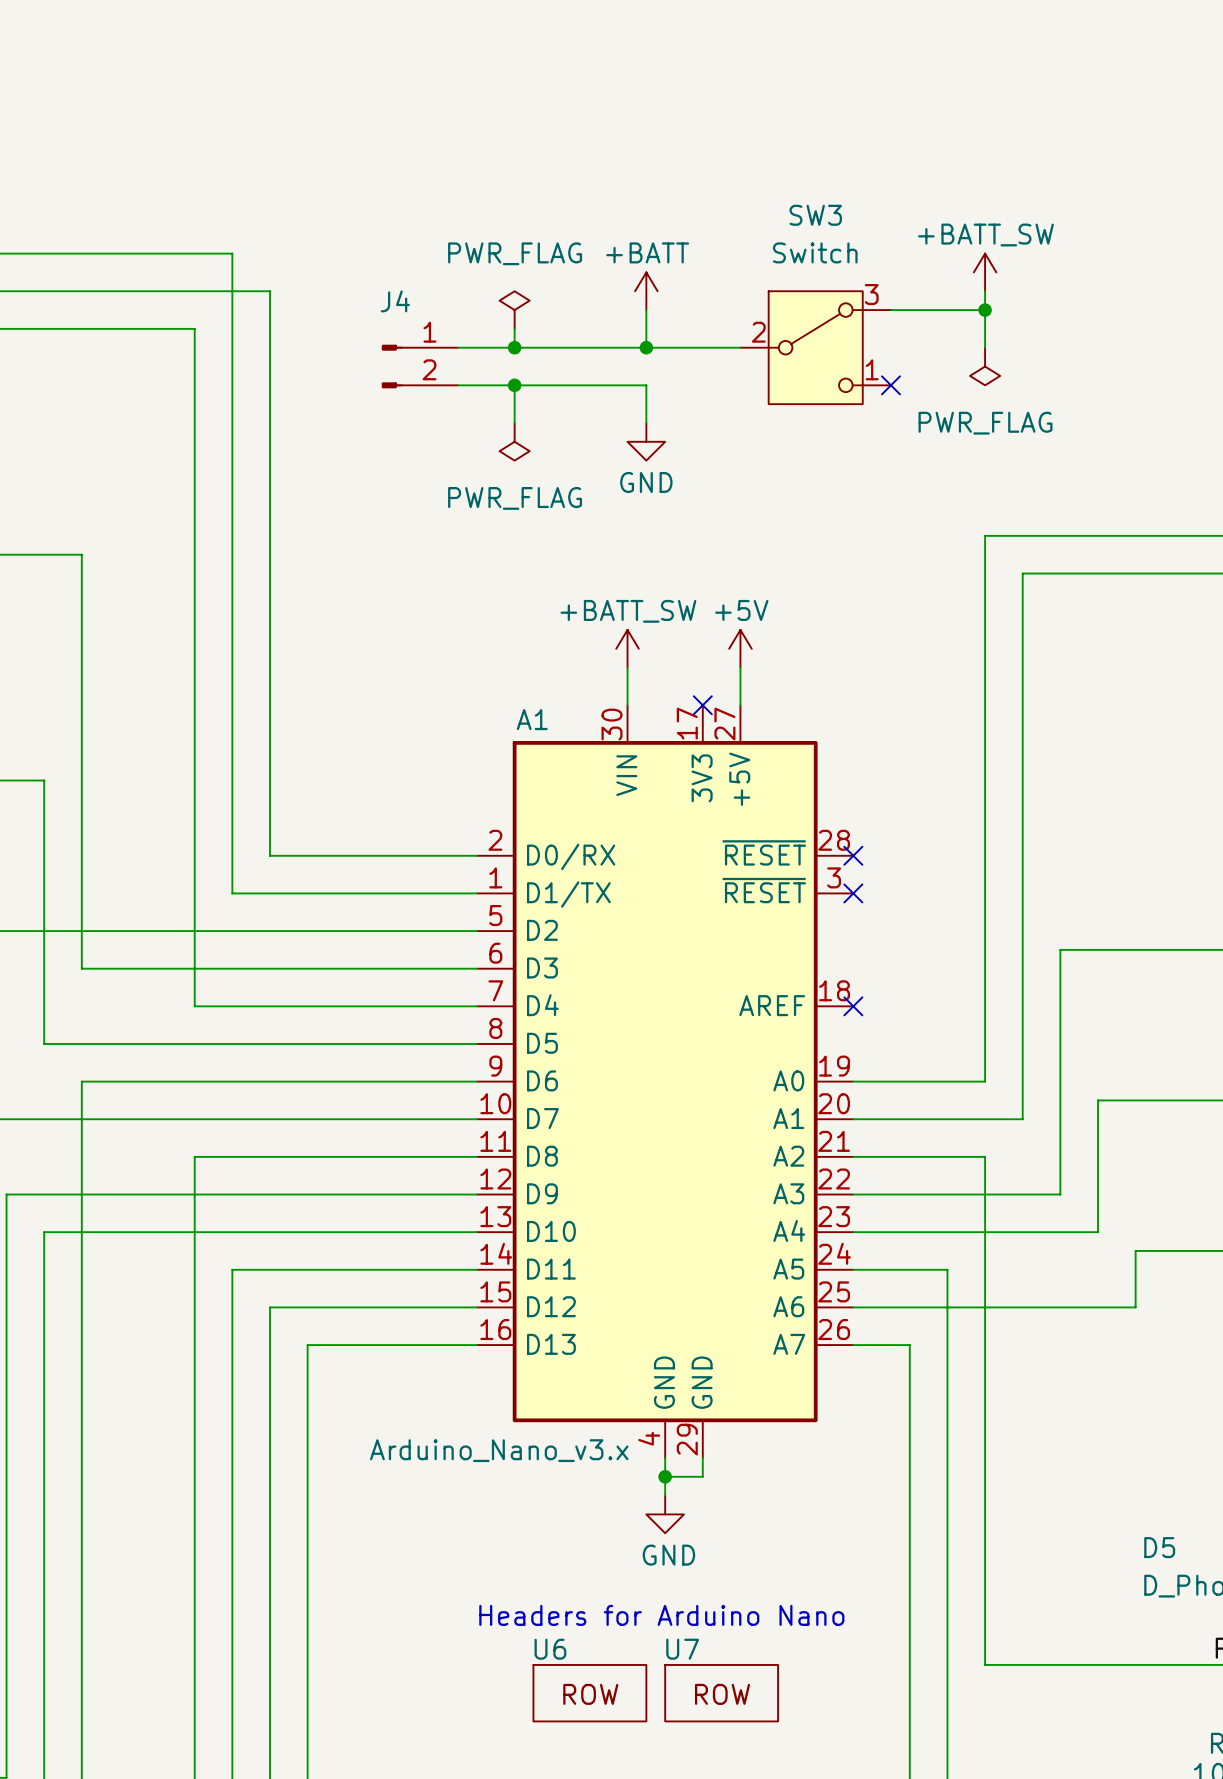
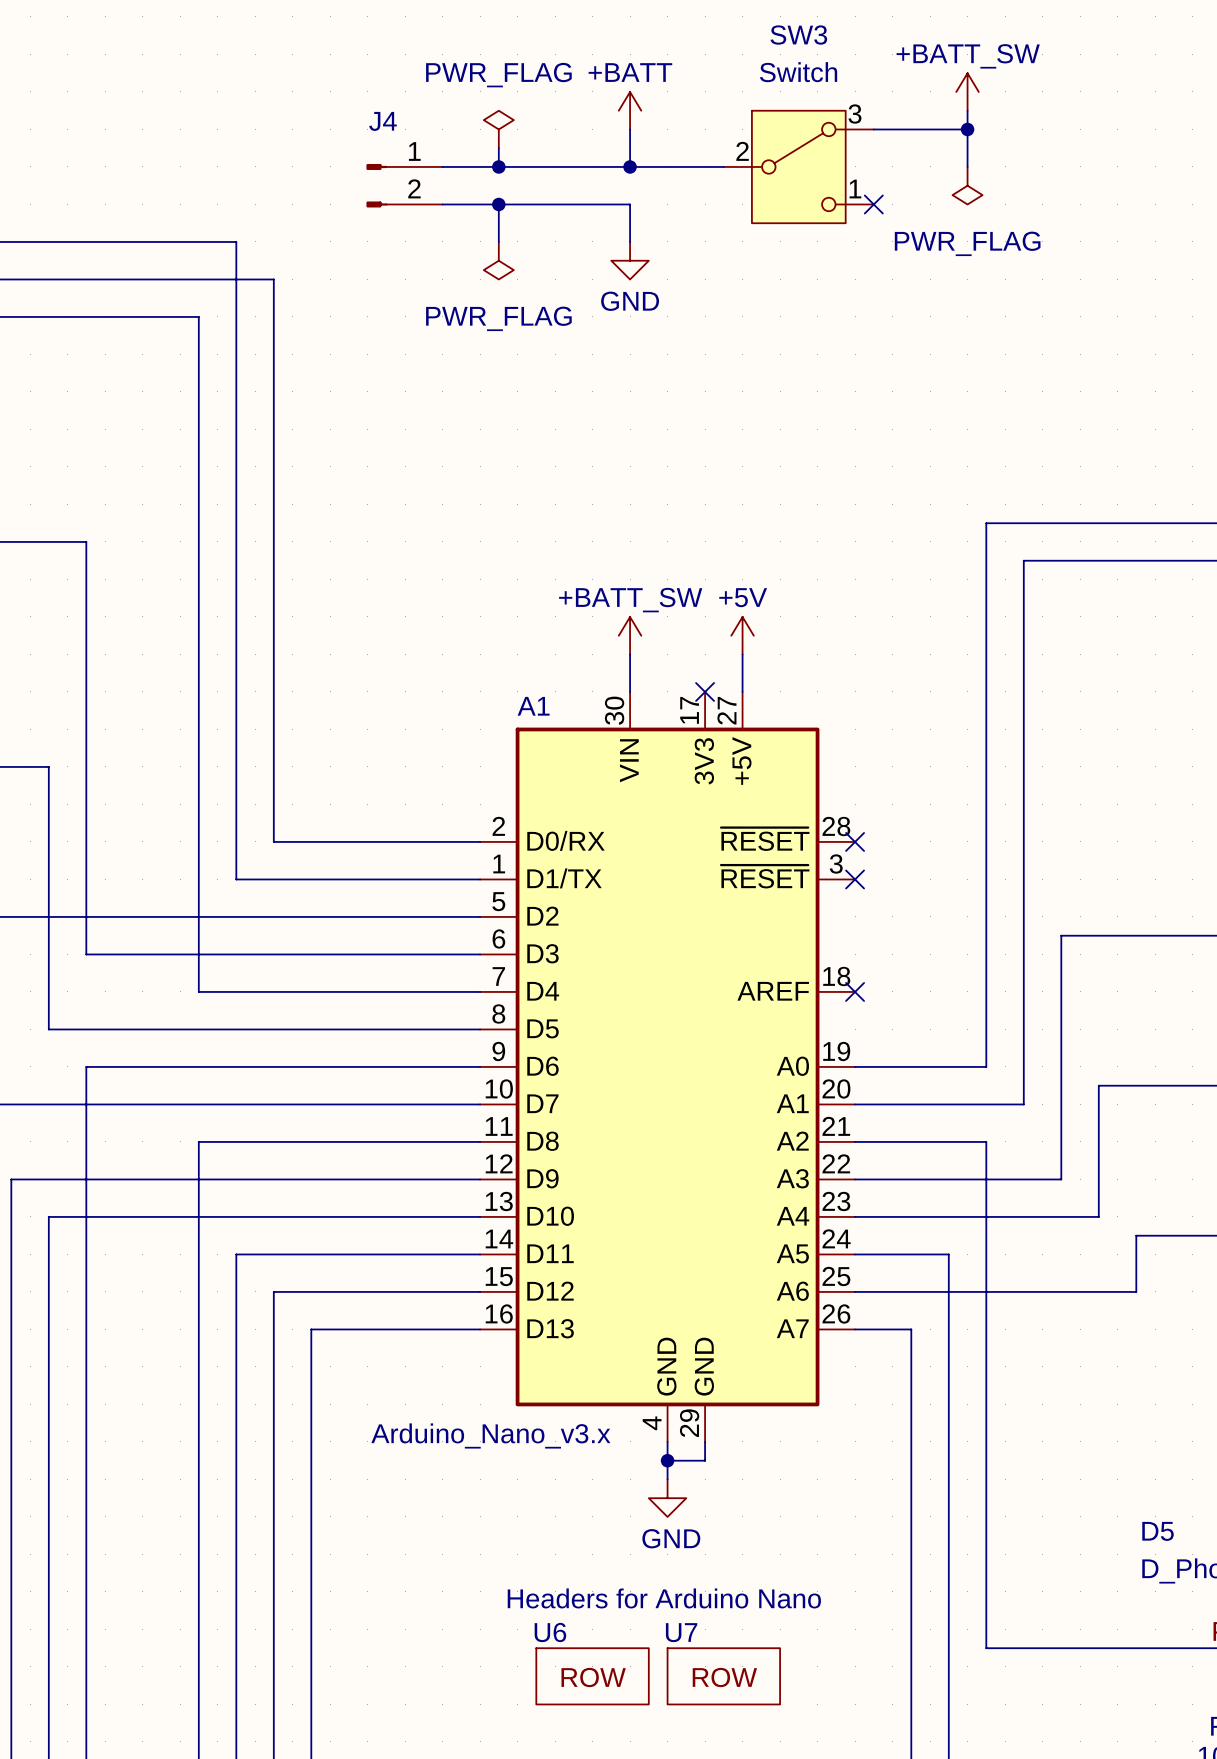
power symbol: none -> PWR_FLAG (498, 129)
junction: none -> (967, 129)
junction: none -> (498, 166)
junction: none -> (630, 166)
junction: none -> (498, 204)
no-connect mark: none -> (873, 204)
power symbol position: +BATT_SW (985, 272) -> +BATT_SW (967, 91)
power symbol position: +BATT (646, 291) -> +BATT (630, 110)
wire: (985, 291) (985, 347) -> (967, 110) (967, 166)
power symbol rotation: 0° (514, 310) -> 180° (498, 260)
power symbol position: PWR_FLAG (514, 310) -> PWR_FLAG (498, 260)
wire: (646, 310) (646, 347) -> (630, 129) (630, 166)
wire: (890, 310) (985, 310) -> (873, 129) (967, 129)
junction: (985, 310) -> none
wire: (514, 328) (514, 347) -> (498, 148) (498, 166)
wire: (458, 347) (740, 347) -> (442, 166) (723, 166)
junction: (514, 347) -> none
junction: (646, 347) -> none
SW3 position: (815, 347) -> (798, 166)
J4 position: (419, 366) -> (404, 185)
power symbol position: PWR_FLAG (985, 366) -> PWR_FLAG (967, 185)
wire: (458, 385) (646, 385) (646, 422) -> (442, 204) (630, 204) (630, 241)
wire: (514, 385) (514, 422) -> (498, 204) (498, 241)
junction: (514, 385) -> none
no-connect mark: (890, 385) -> none
power symbol: PWR_FLAG (514, 441) -> none
power symbol position: GND (646, 441) -> GND (630, 260)

